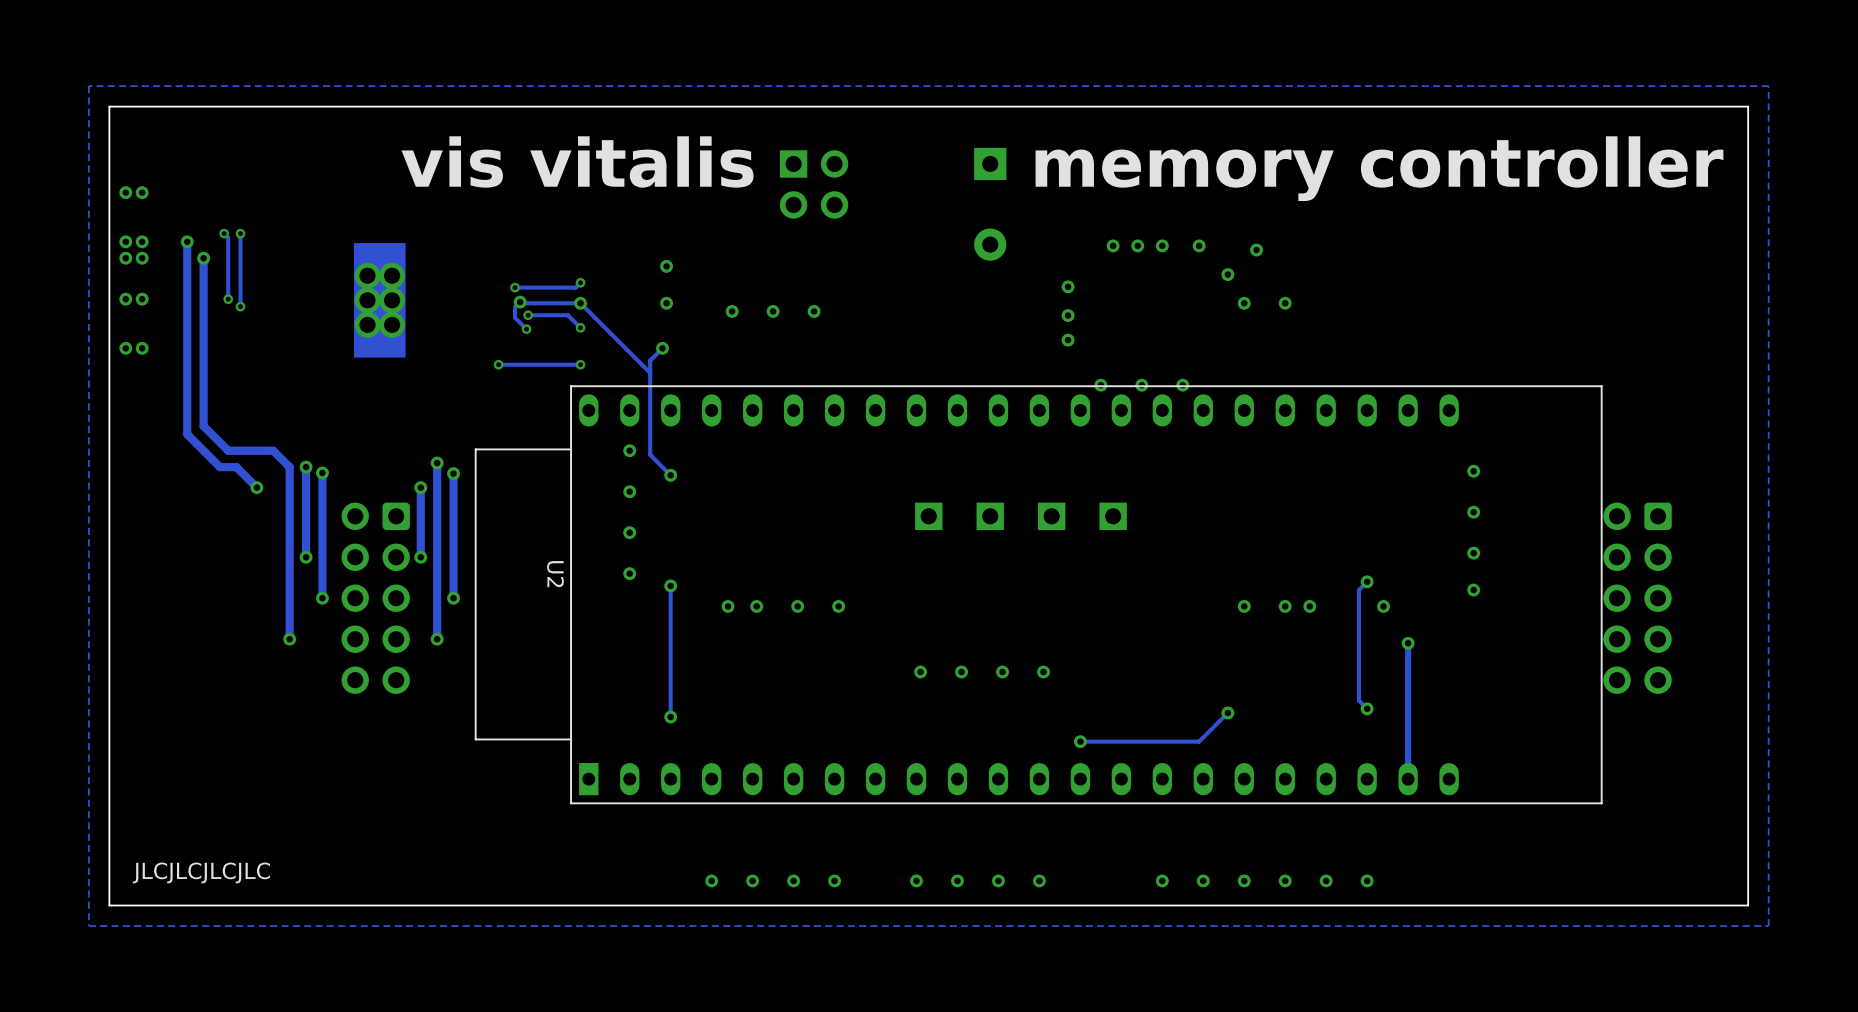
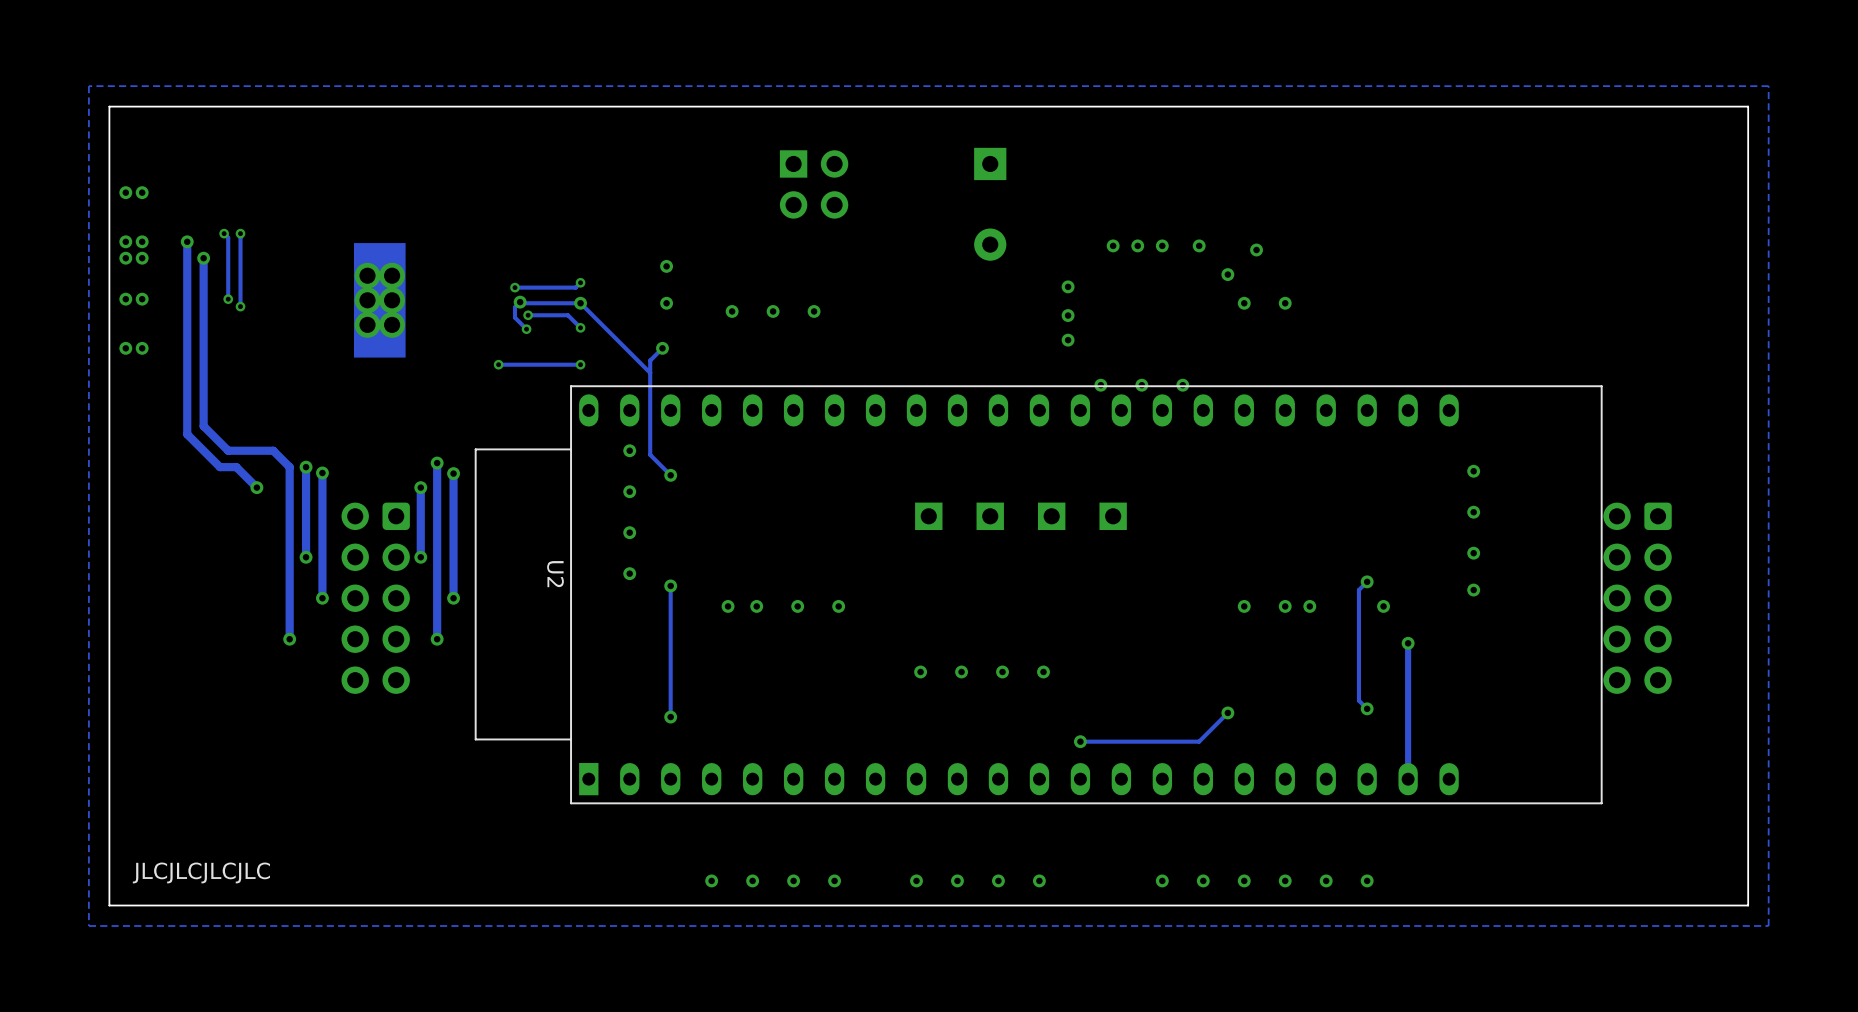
text: vis vitalis (577, 161) -> none
text: memory controller (1379, 168) -> none

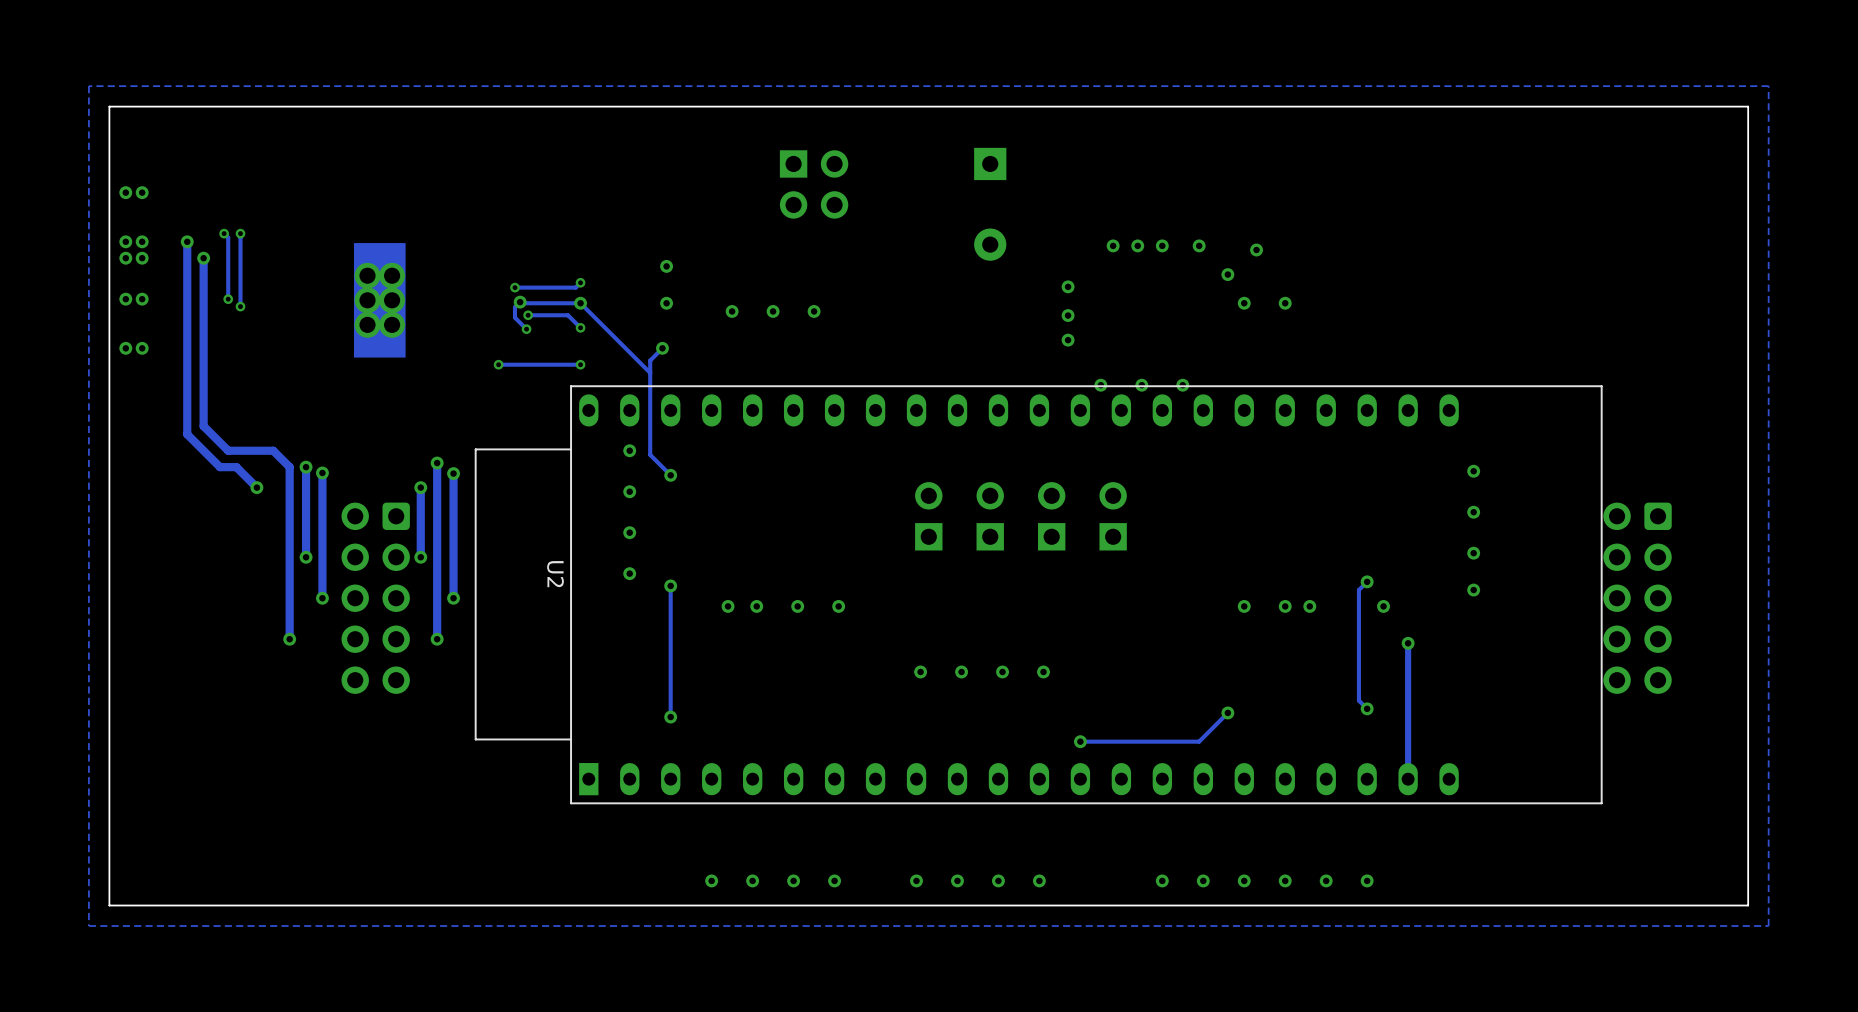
part footprint: [915, 502, 943, 531] -> [915, 482, 943, 551]
part footprint: [976, 502, 1004, 531] -> [976, 482, 1004, 551]
part footprint: [1037, 502, 1066, 531] -> [1037, 482, 1066, 551]
part footprint: [1099, 502, 1127, 531] -> [1099, 482, 1127, 551]
text: JLCJLCJLCJLC (201, 872) -> none

